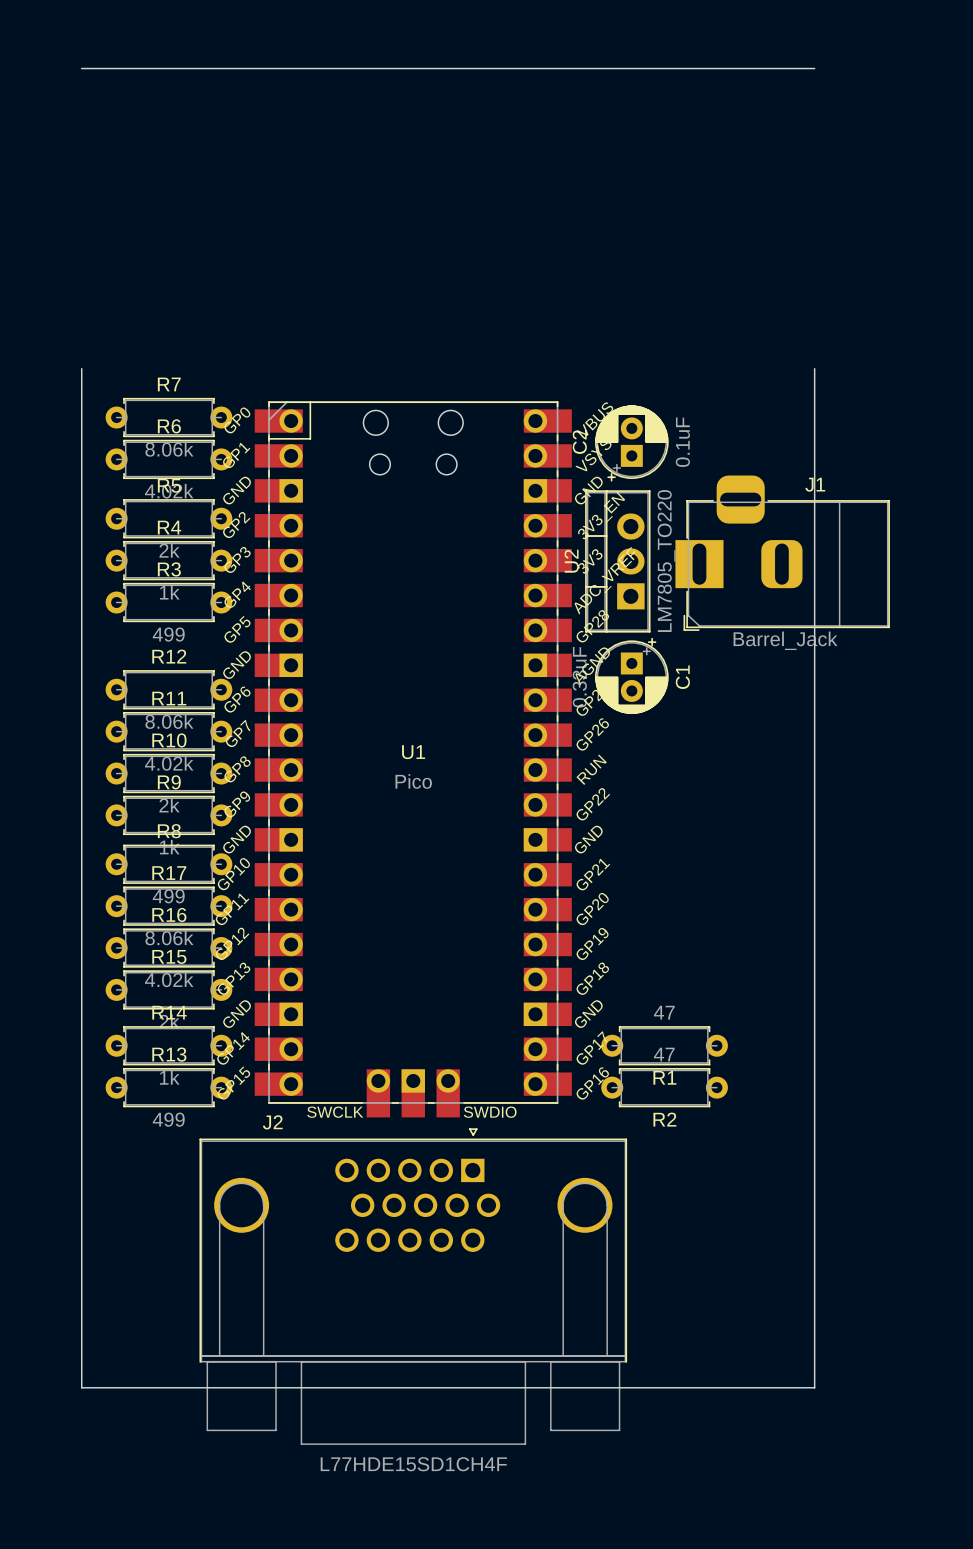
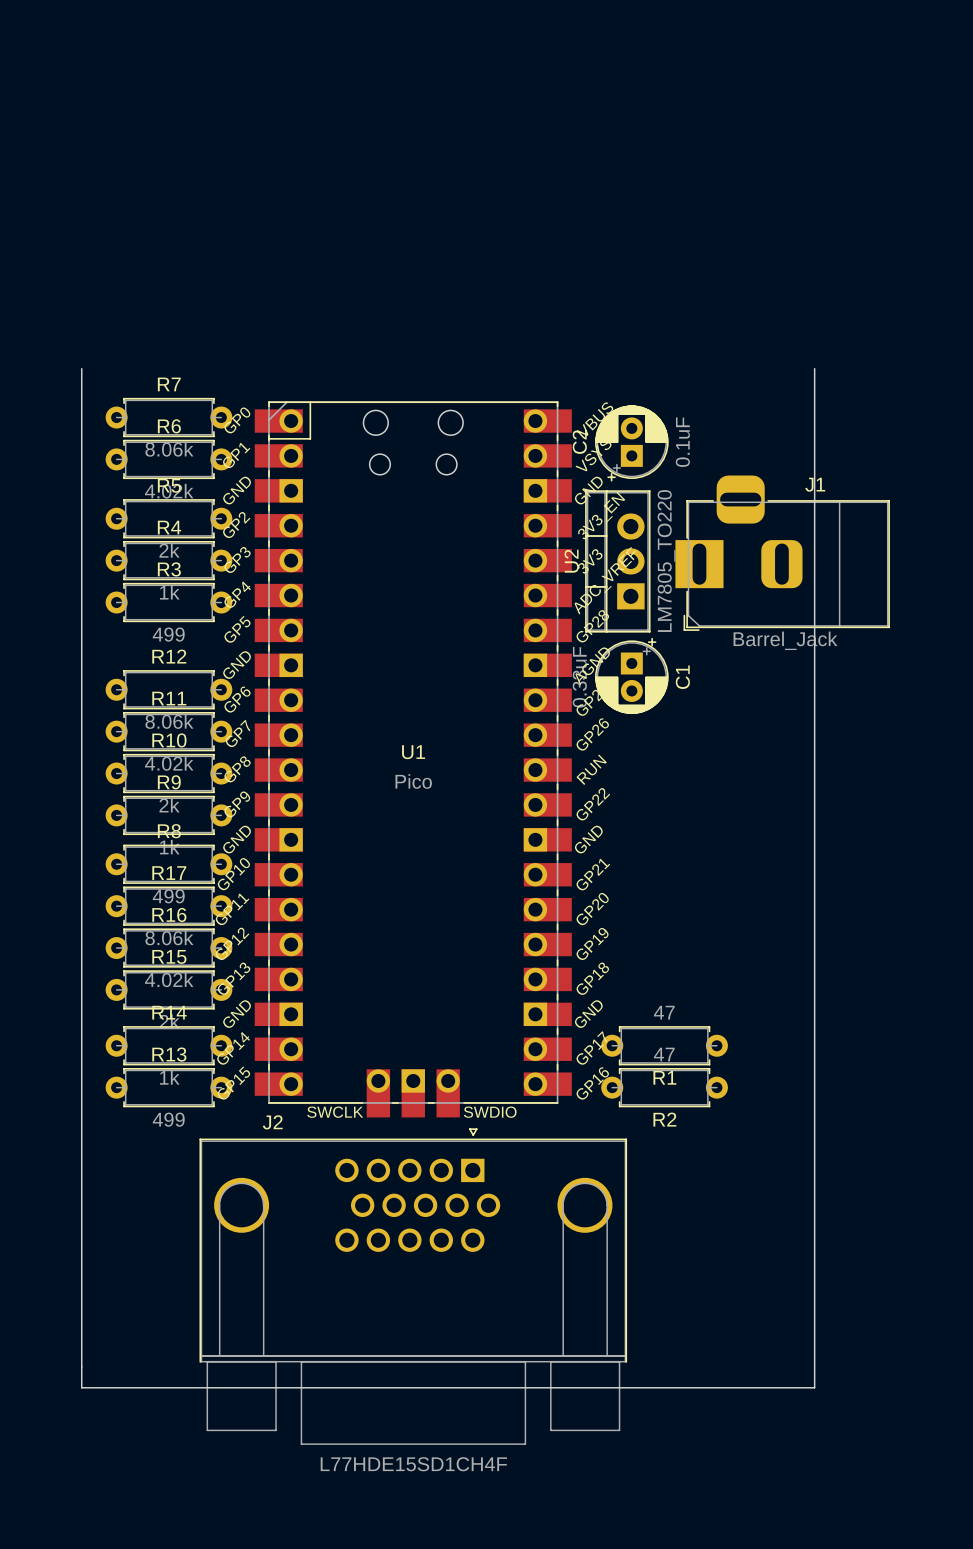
board edge: (81, 68) (814, 68) -> none

